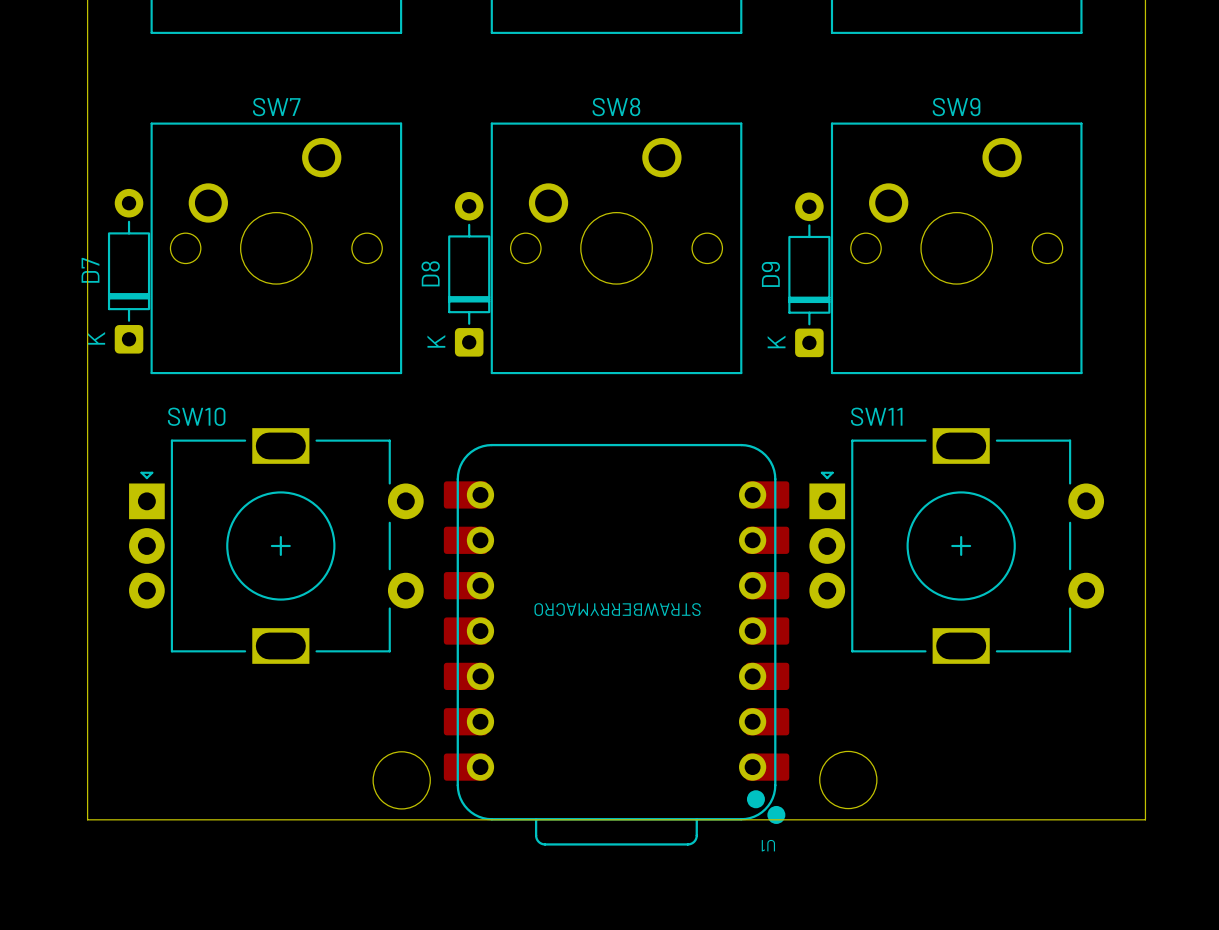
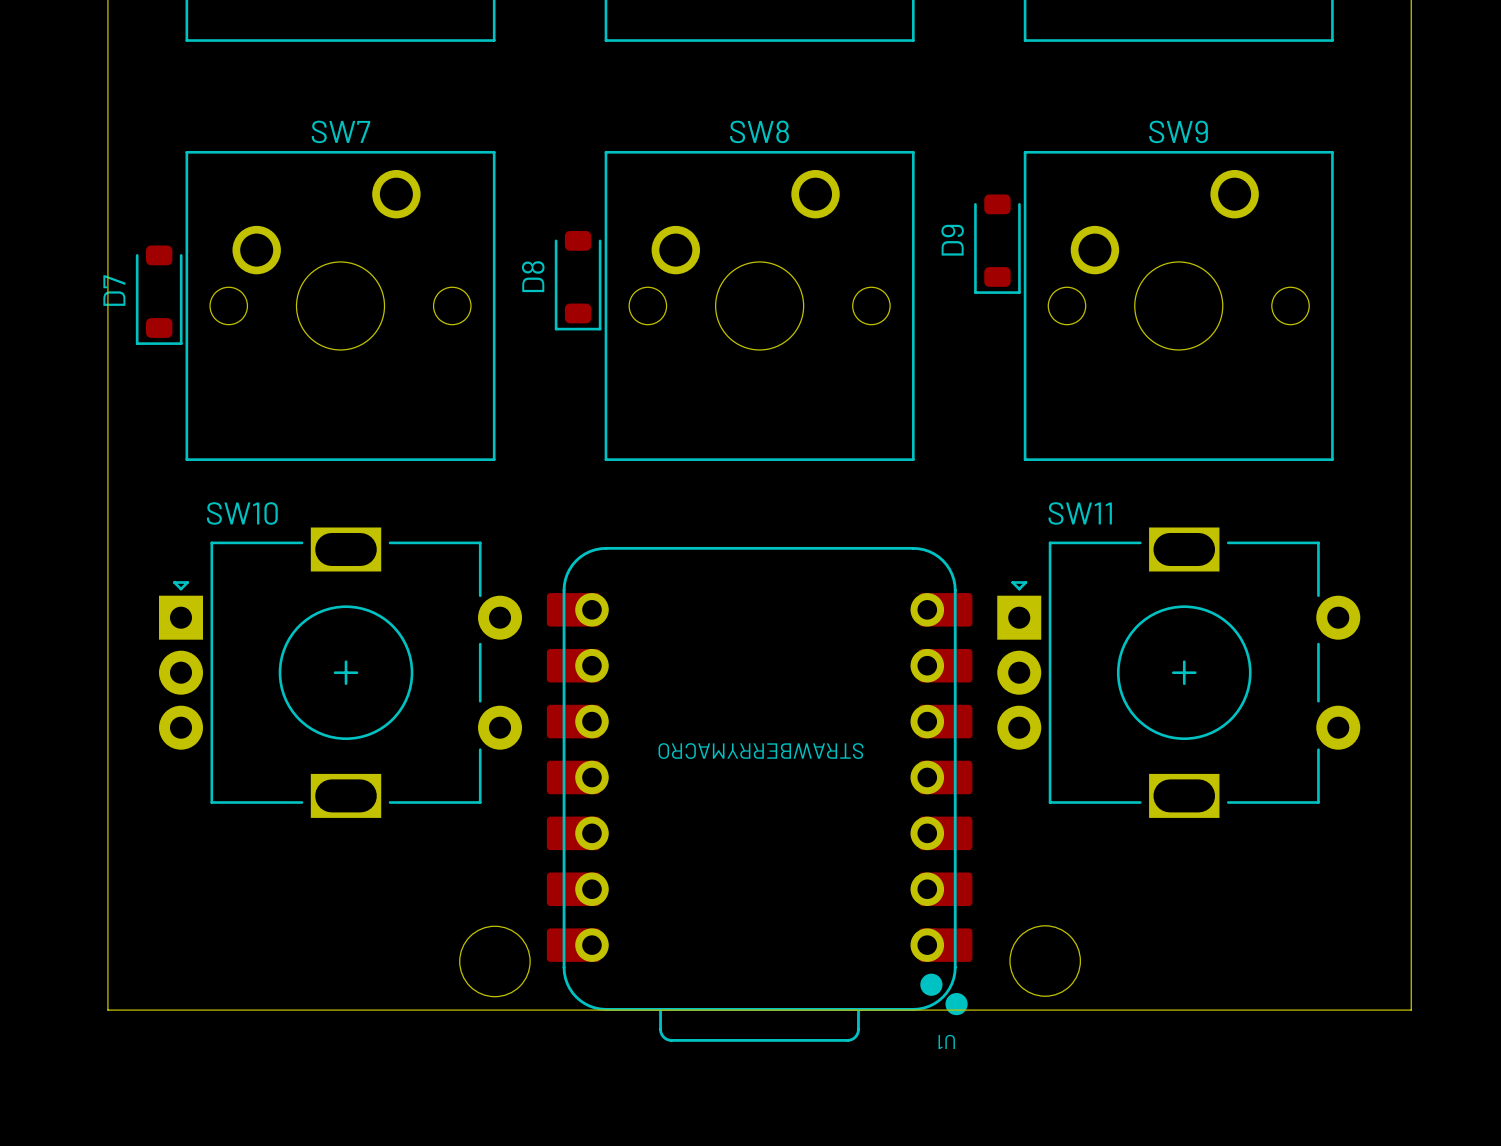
D7 footprint: [107, 188, 151, 354] -> [135, 245, 183, 345]
D8 footprint: [448, 191, 491, 357] -> [554, 230, 602, 331]
D9 footprint: [788, 192, 831, 358] -> [974, 194, 1021, 294]

